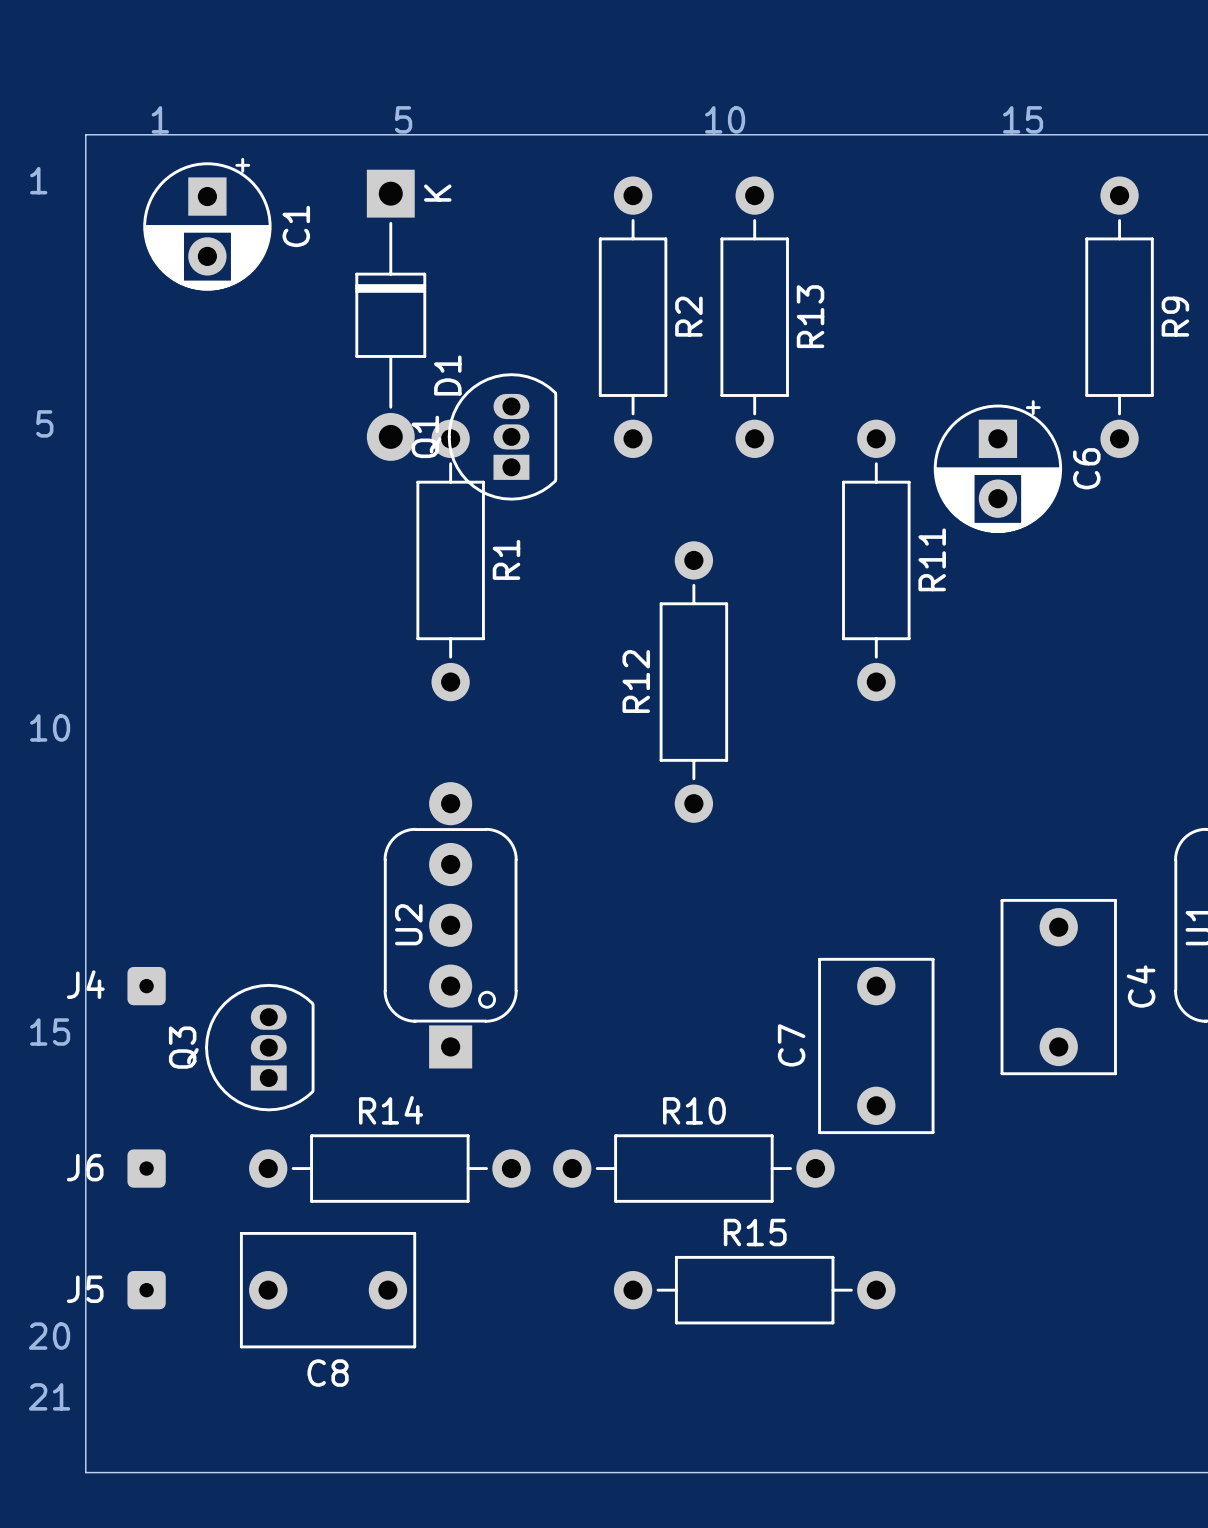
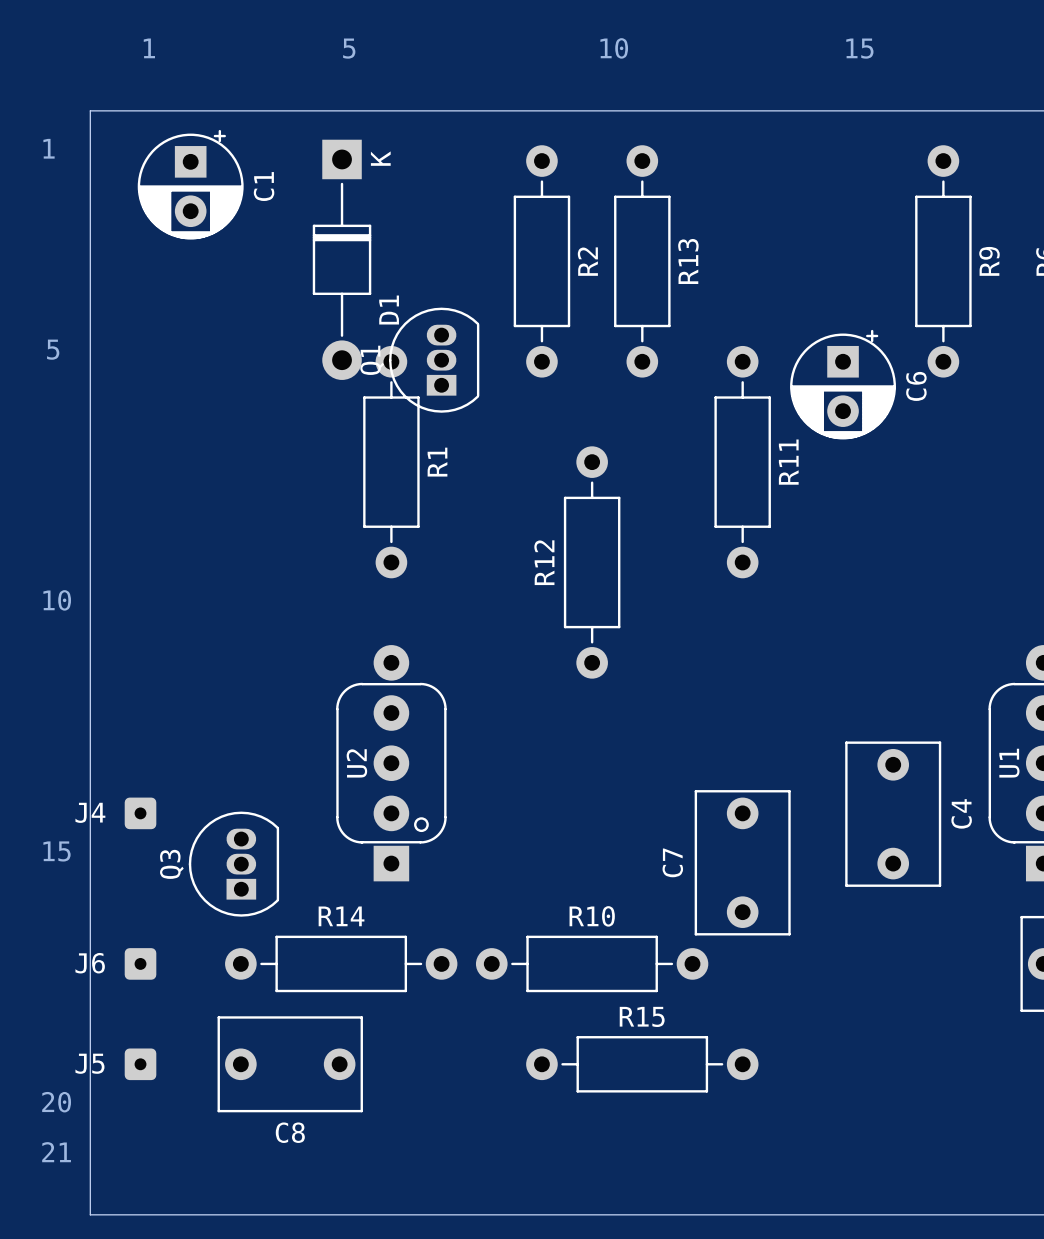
text position: 1 (160, 119) -> 1 (149, 48)
text position: 5 (403, 119) -> 5 (349, 48)
text position: 10 (725, 119) -> 10 (614, 48)
text position: 15 (1023, 119) -> 15 (859, 48)

